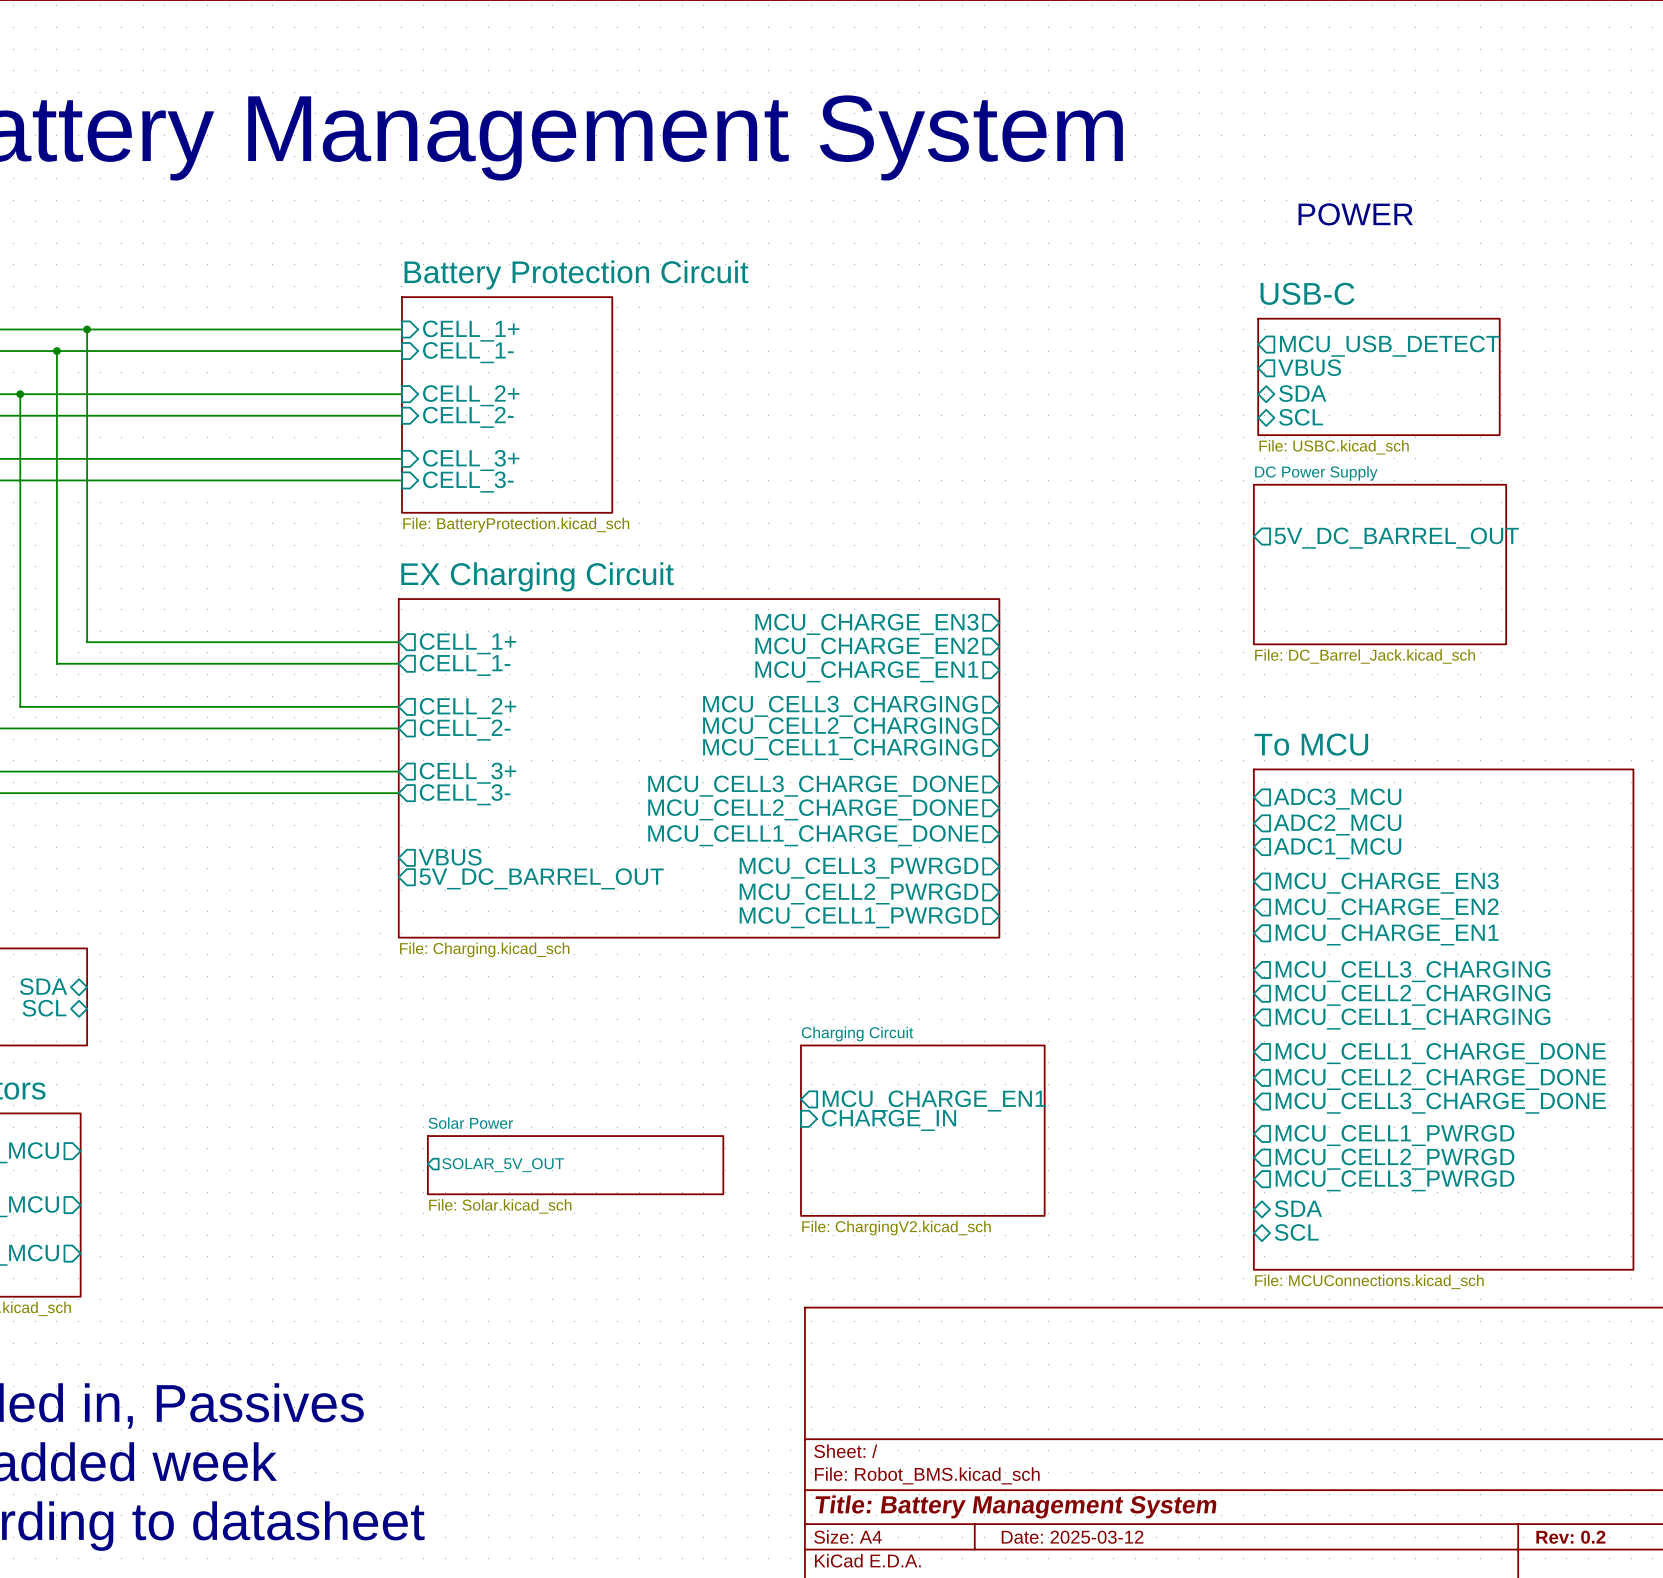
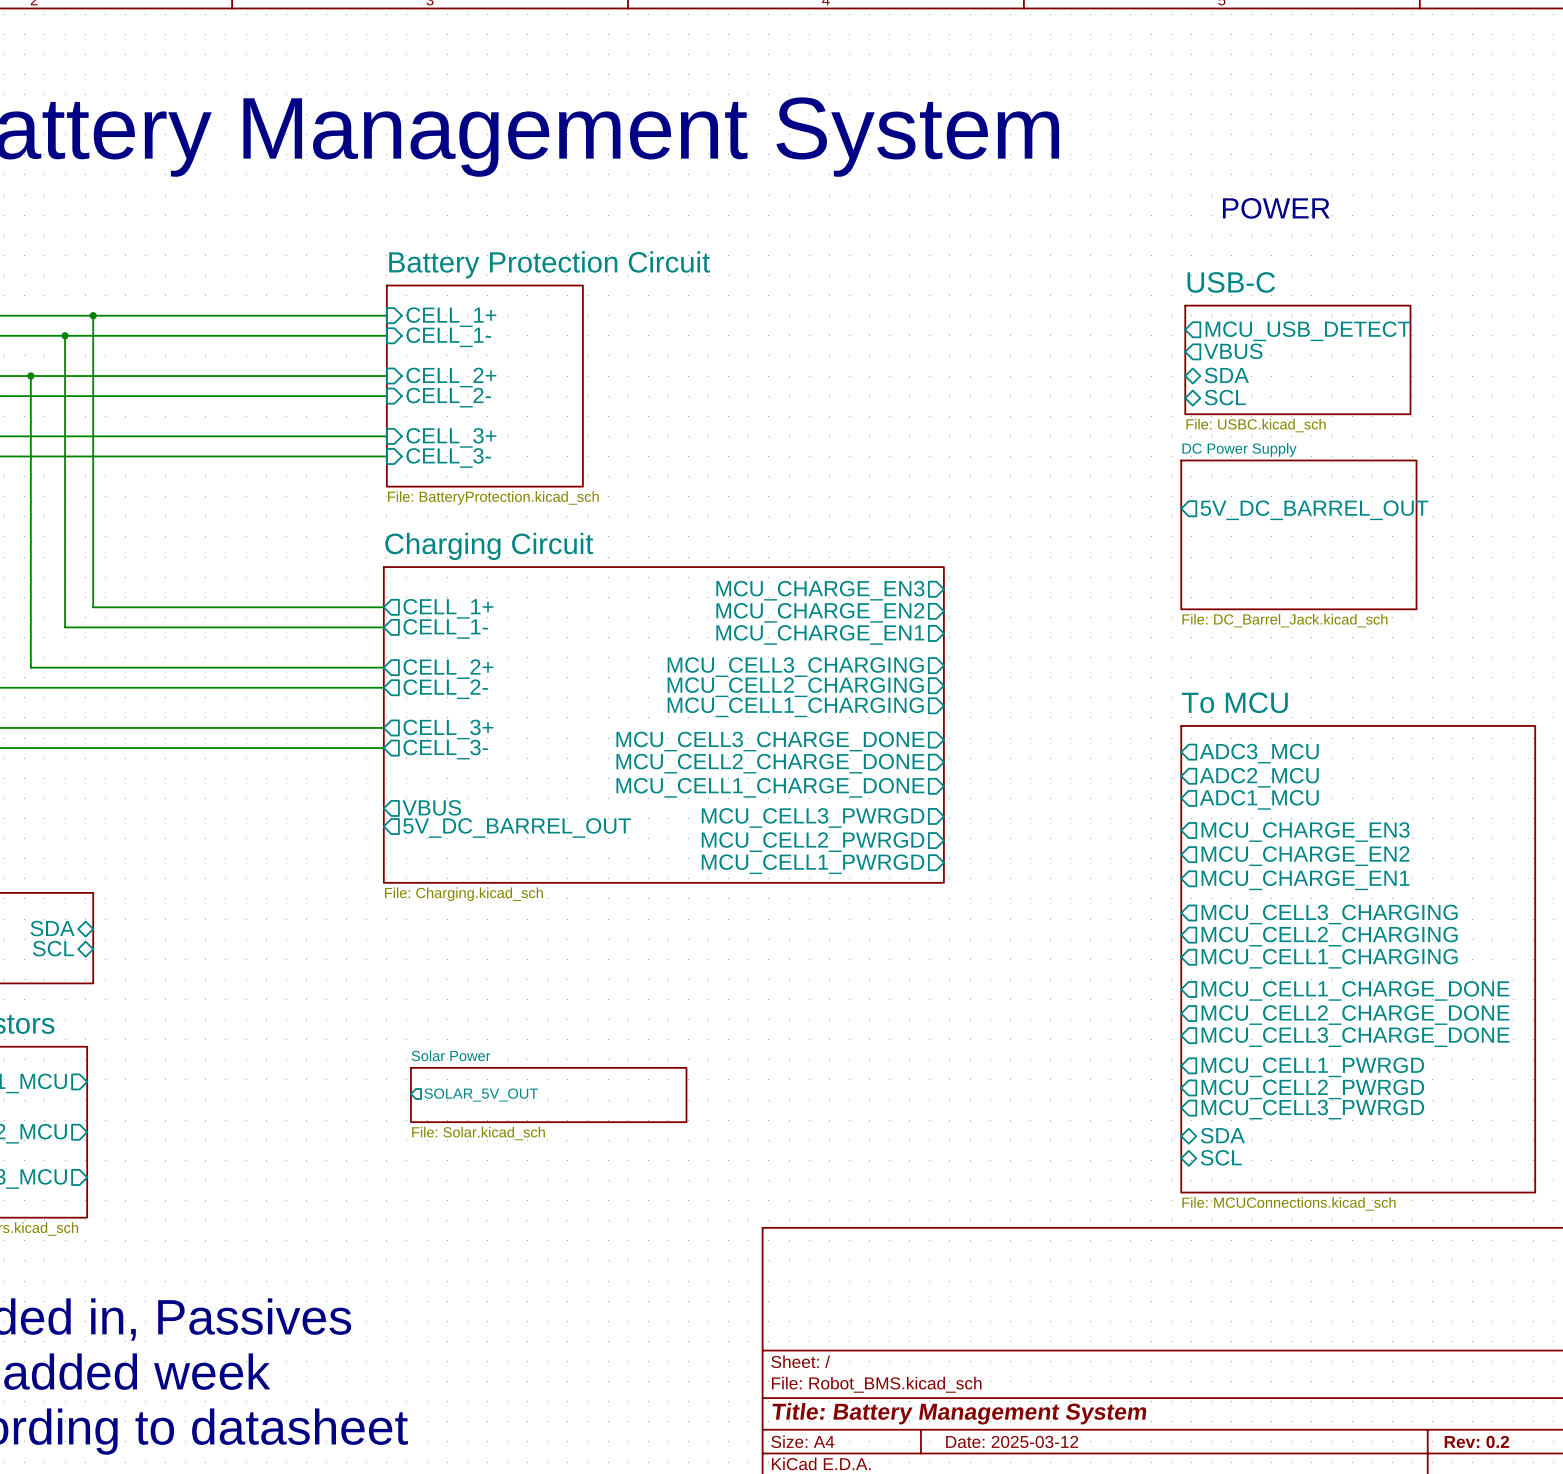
sheet EX Charging Circuit name: EX Charging Circuit (537, 576) -> Charging Circuit (489, 546)
sheet pin: MCU_CHARGE_EN1 (934, 1101) -> none
sheet pin: CHARGE_IN (889, 1120) -> none
sheet Charging Circuit: File: ChargingV2.kicad_sch (922, 1130) -> none

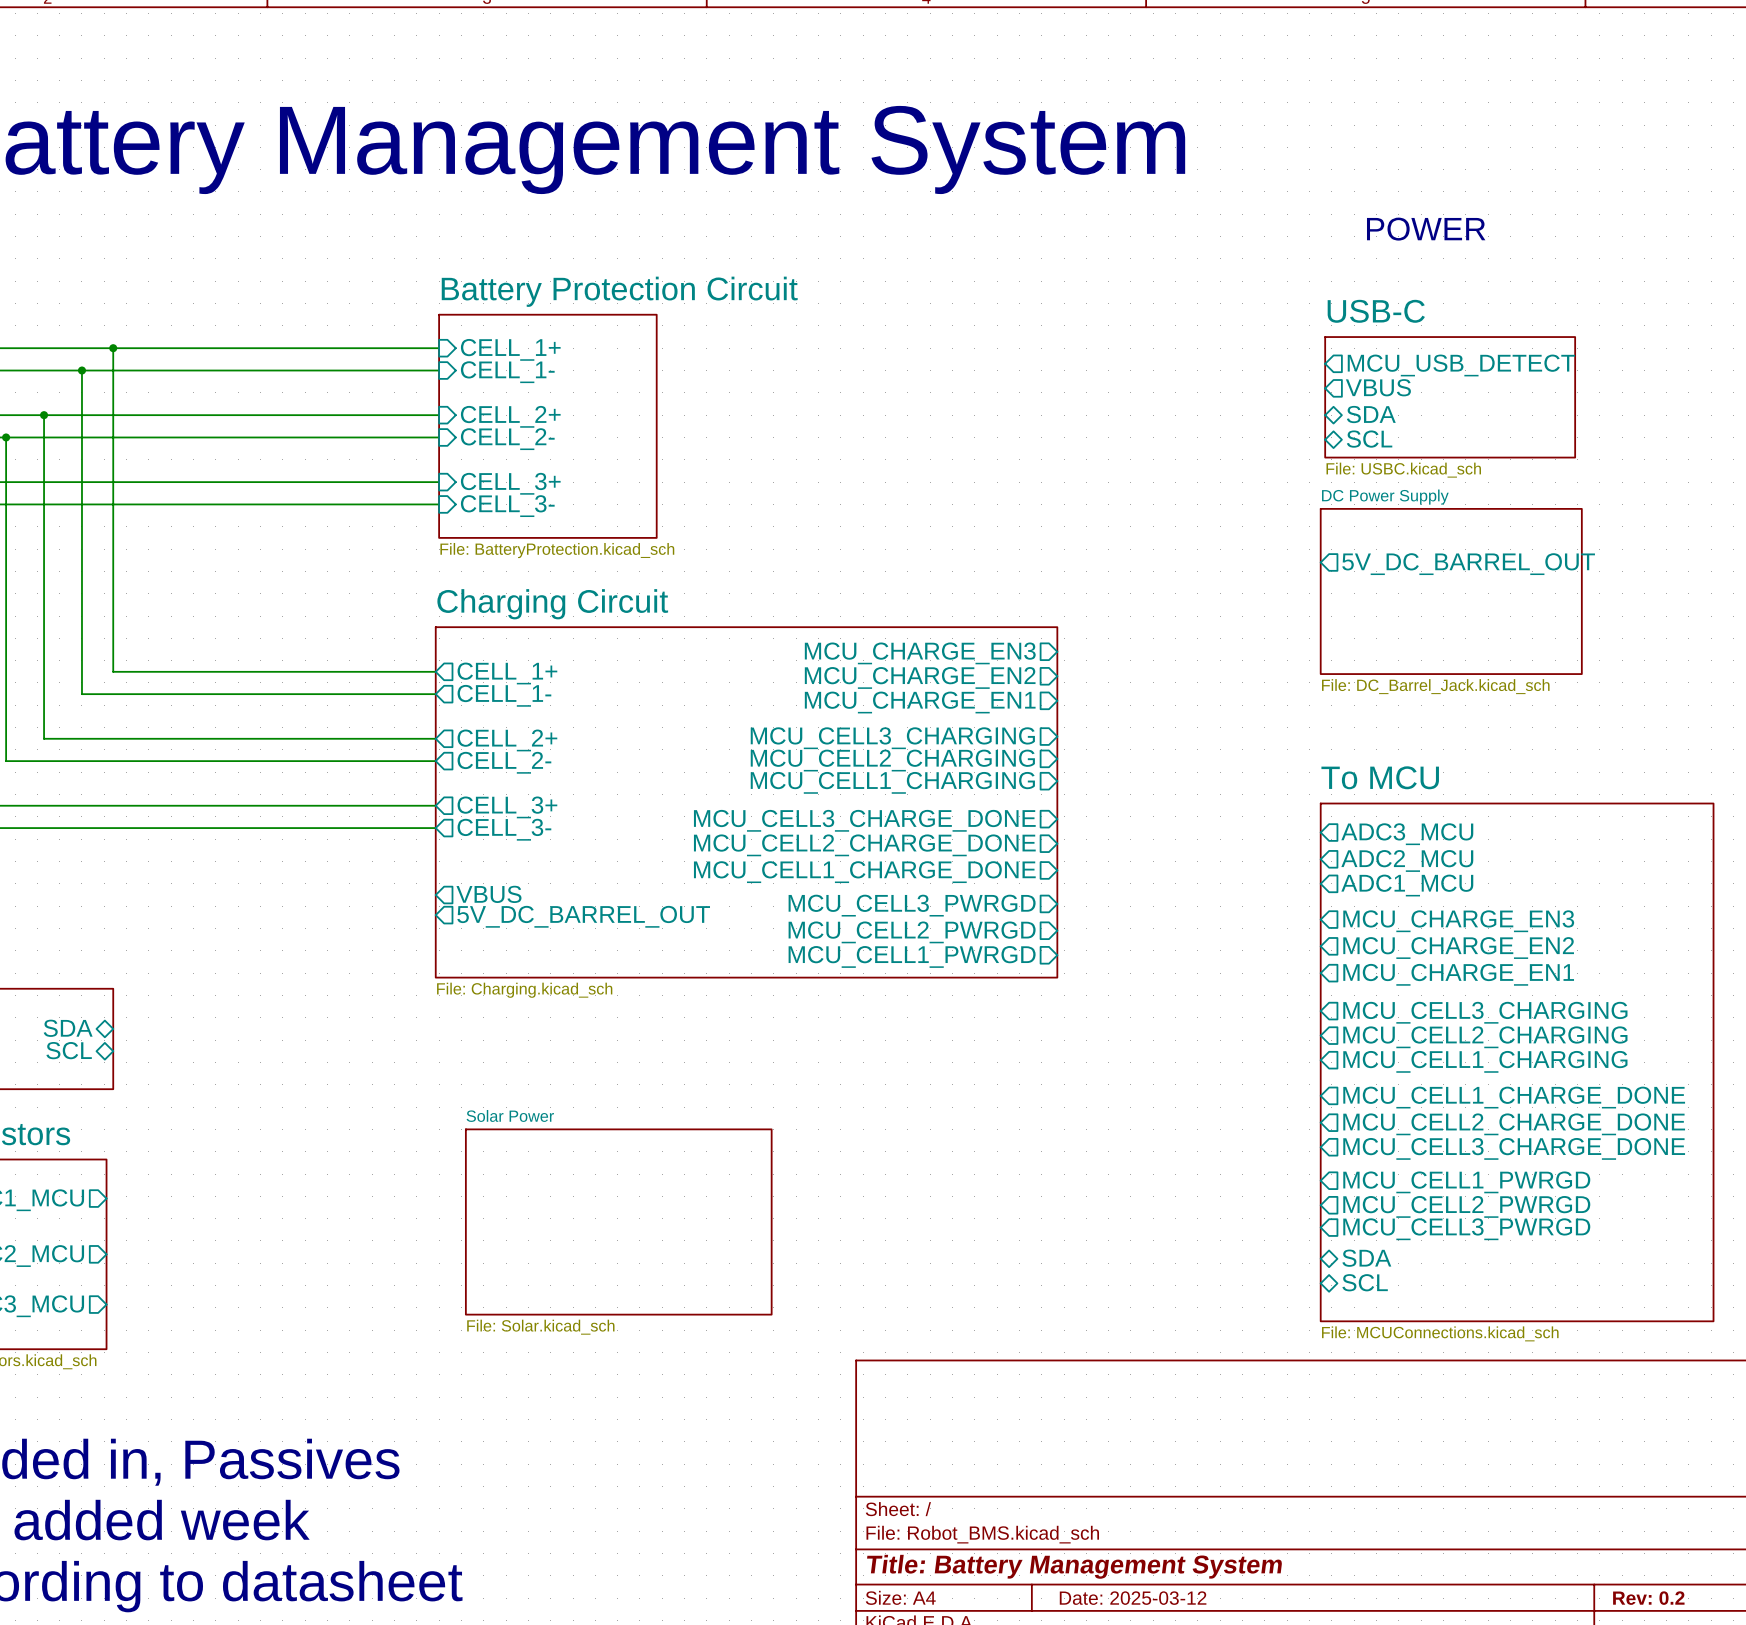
sheet pin: SOLAR_5V_OUT (481, 1095) -> none
sheet Solar Power: File: Solar.kicad_sch (548, 1095) -> none
sheet Solar Power: none -> File: Solar.kicad_sch (618, 1222)

